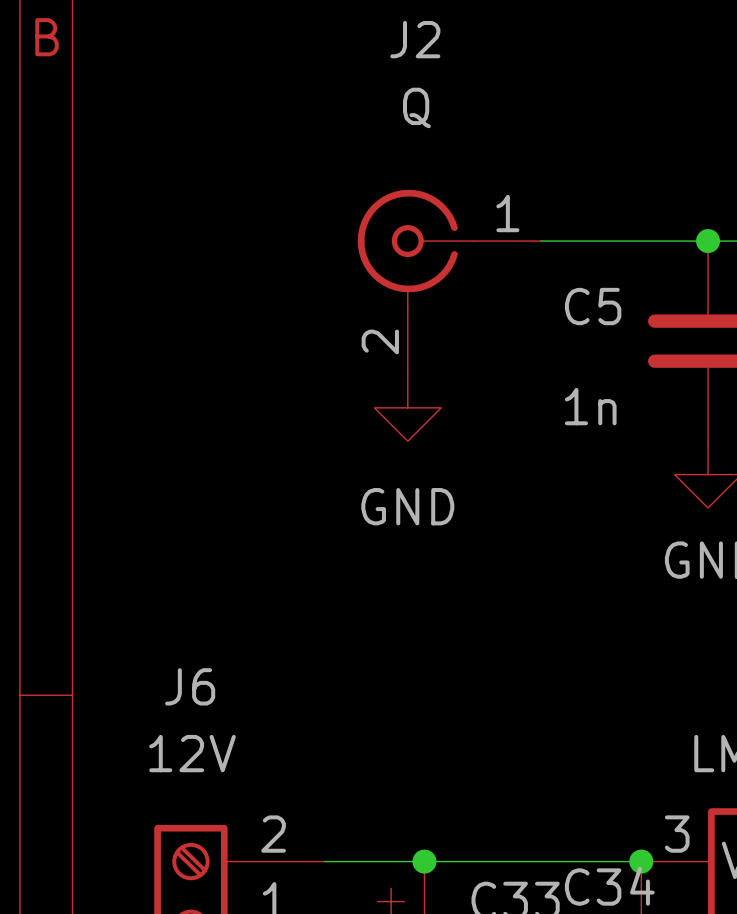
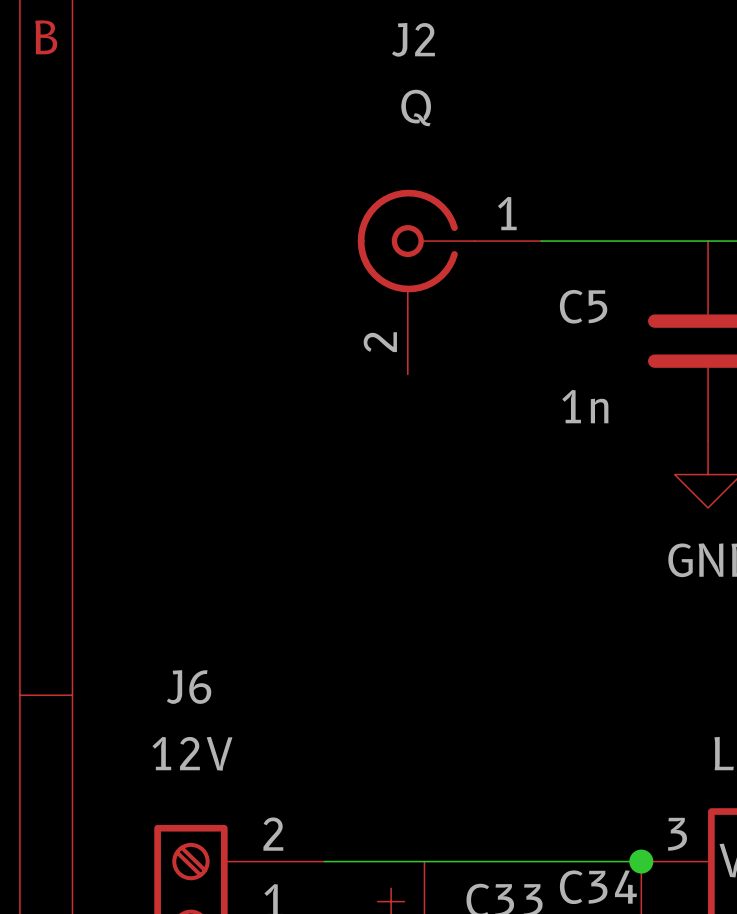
junction: (708, 241) -> none
power symbol: GND (407, 407) -> none
junction: (424, 861) -> none

